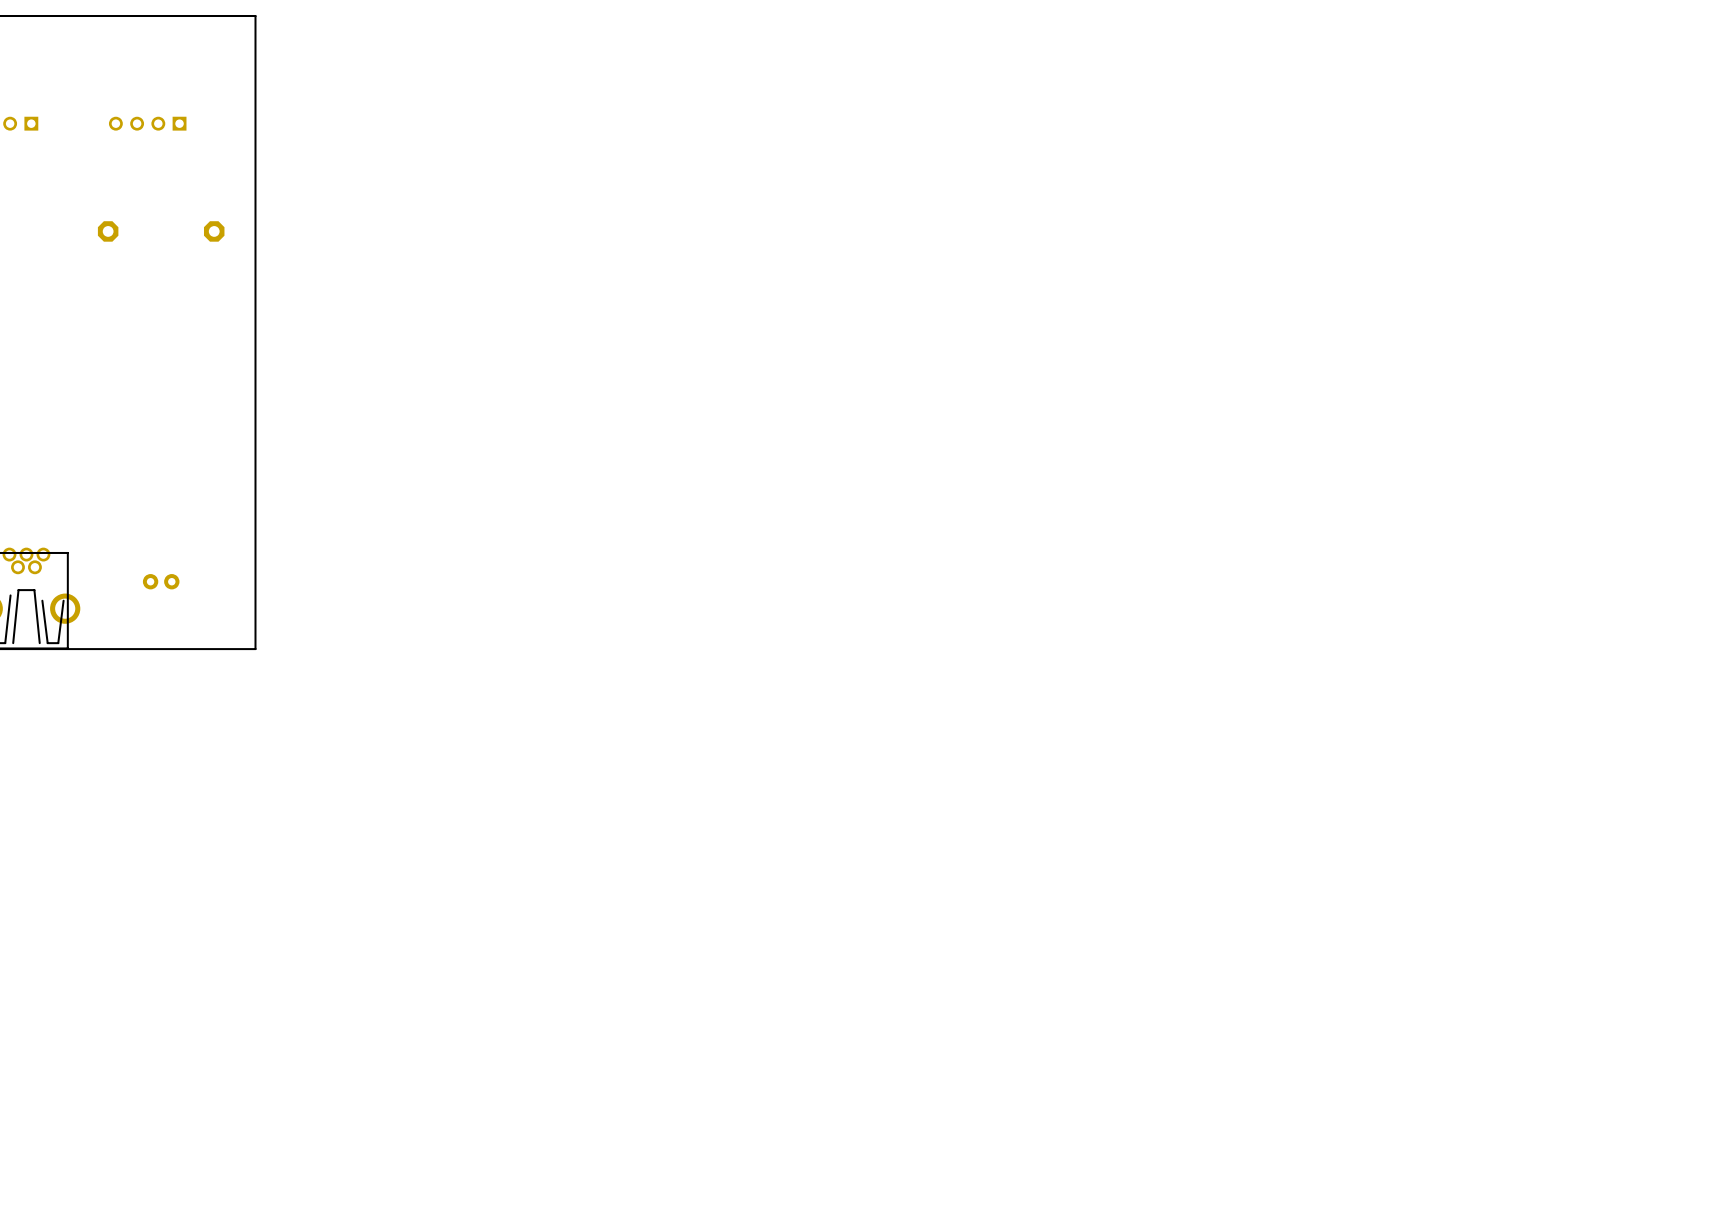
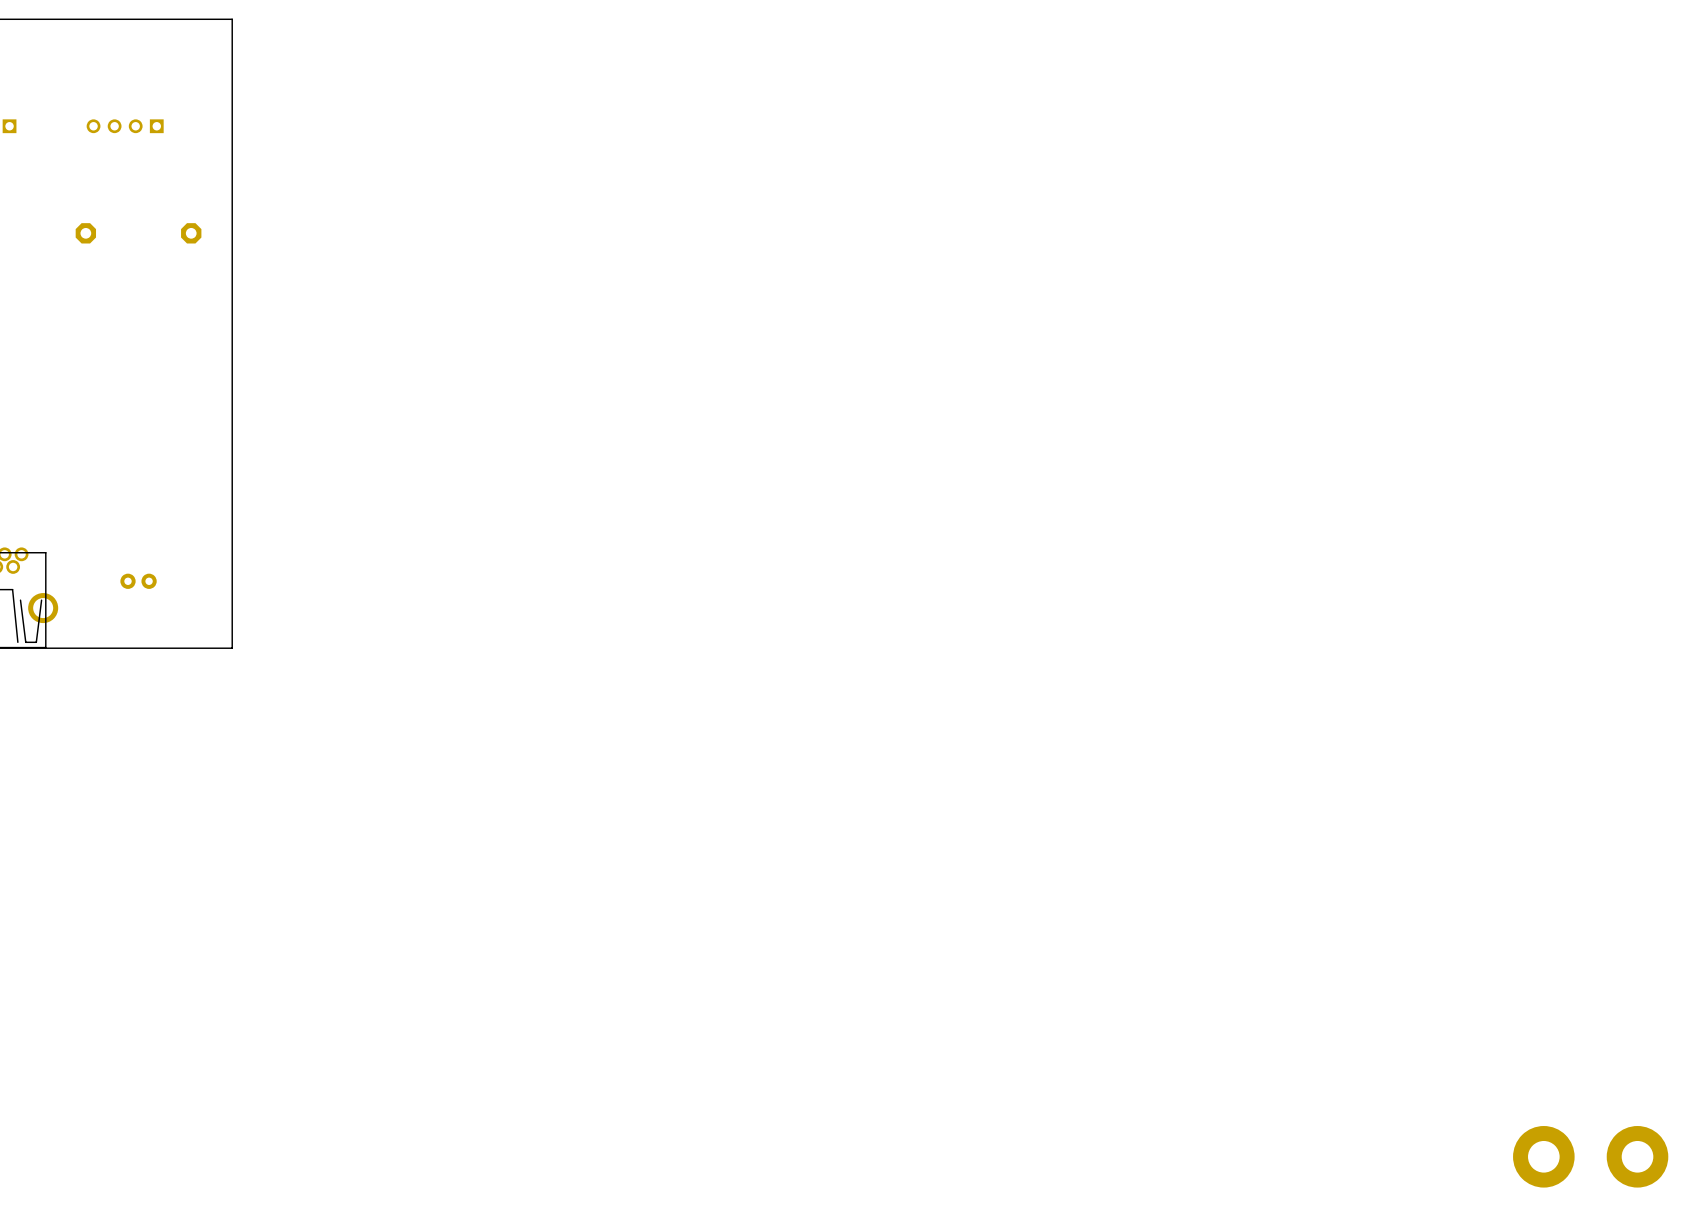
part: none -> (1543, 1156)
part: none -> (1637, 1156)

